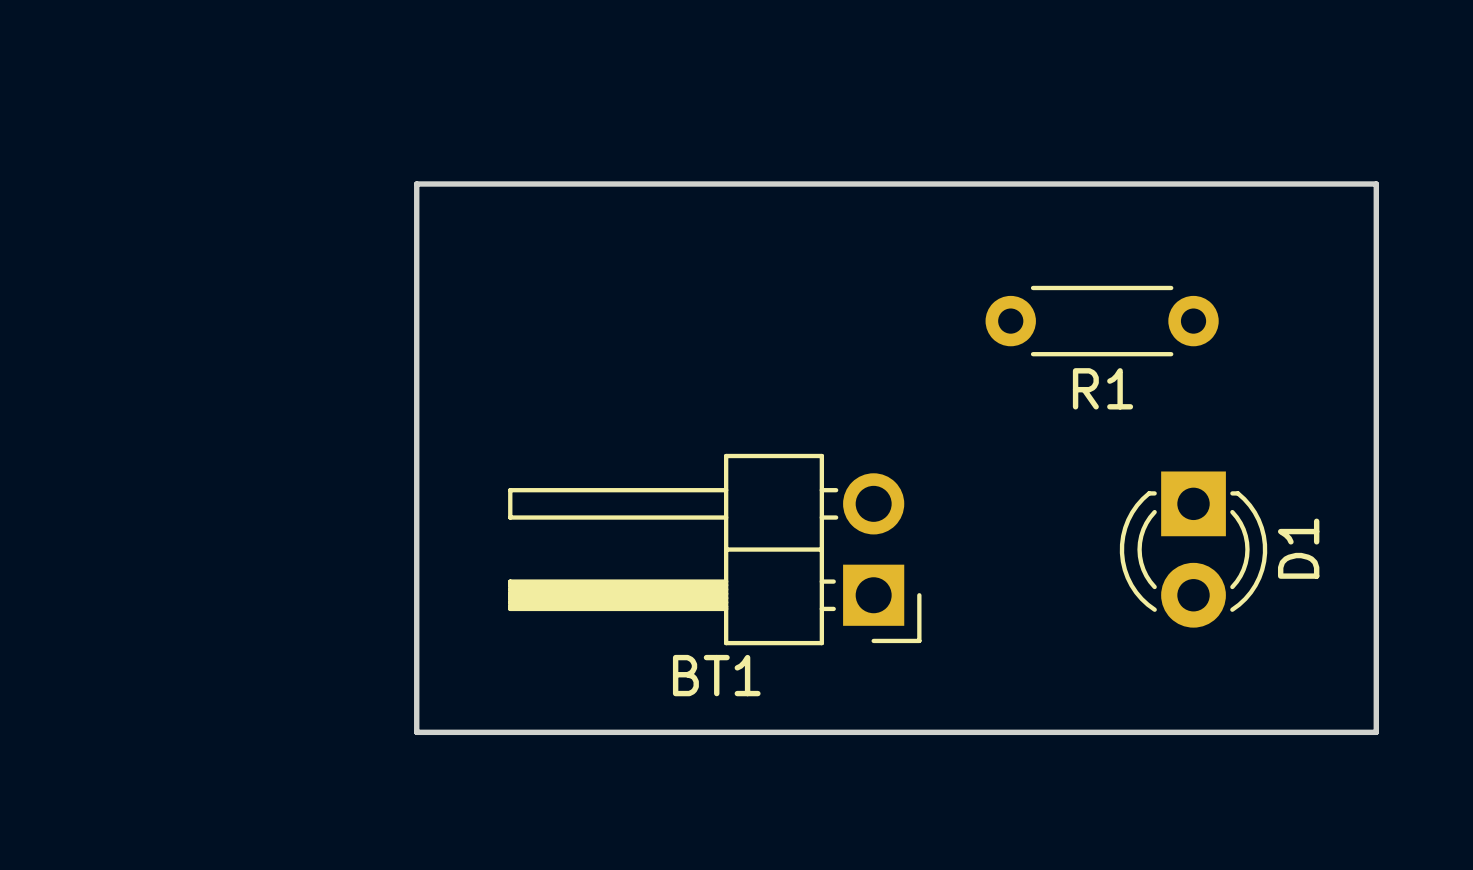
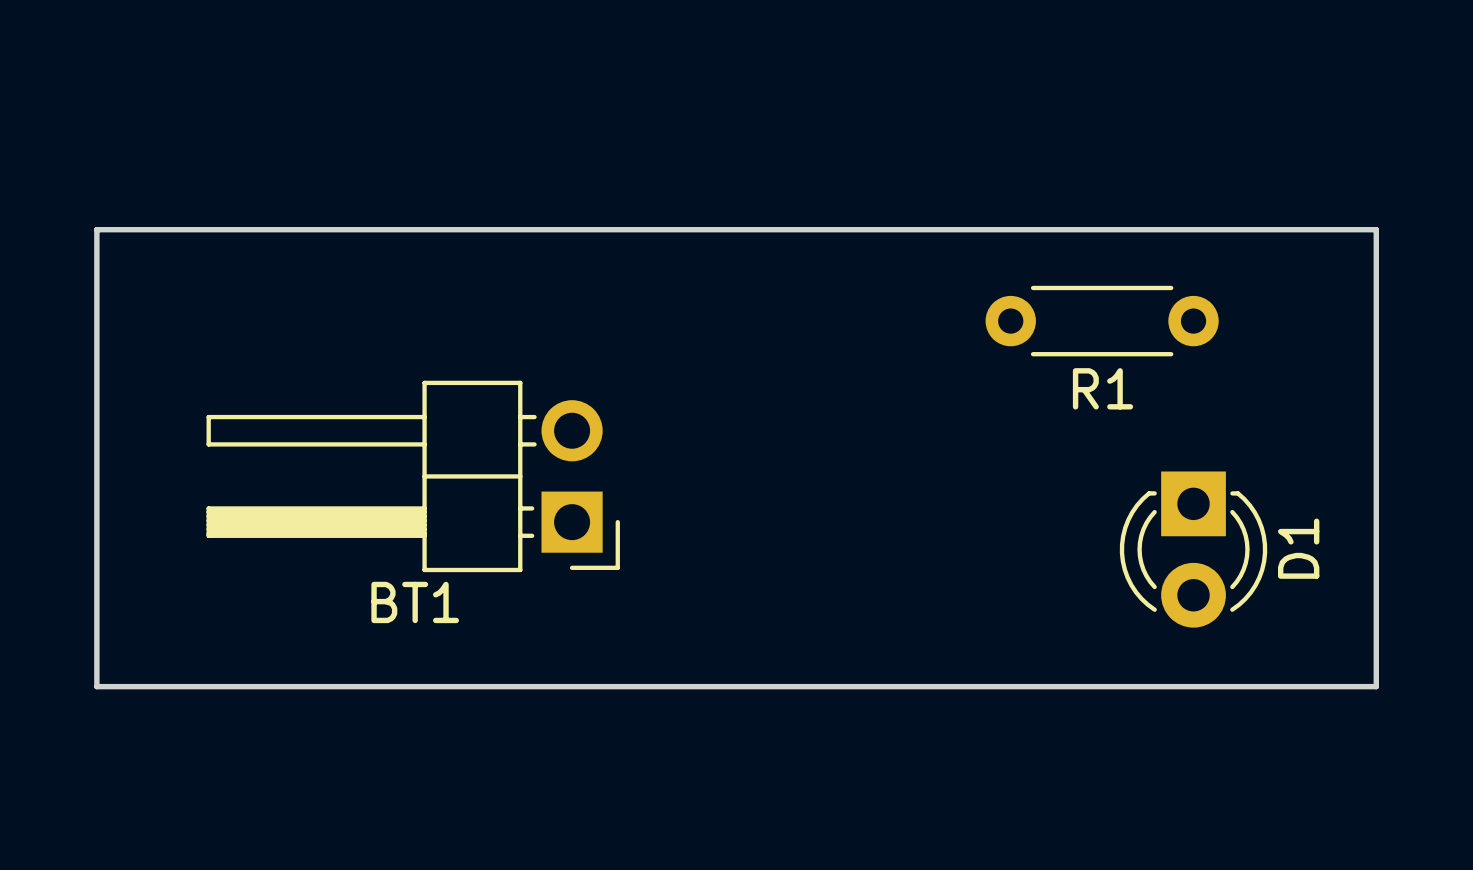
board edge: (1376, 229) (1376, 184) (416, 184) (416, 732) (1376, 732) (1376, 686) -> (1376, 229) (96, 229) (96, 686) (1376, 686)
BT1 position: (714, 549) -> (413, 476)

